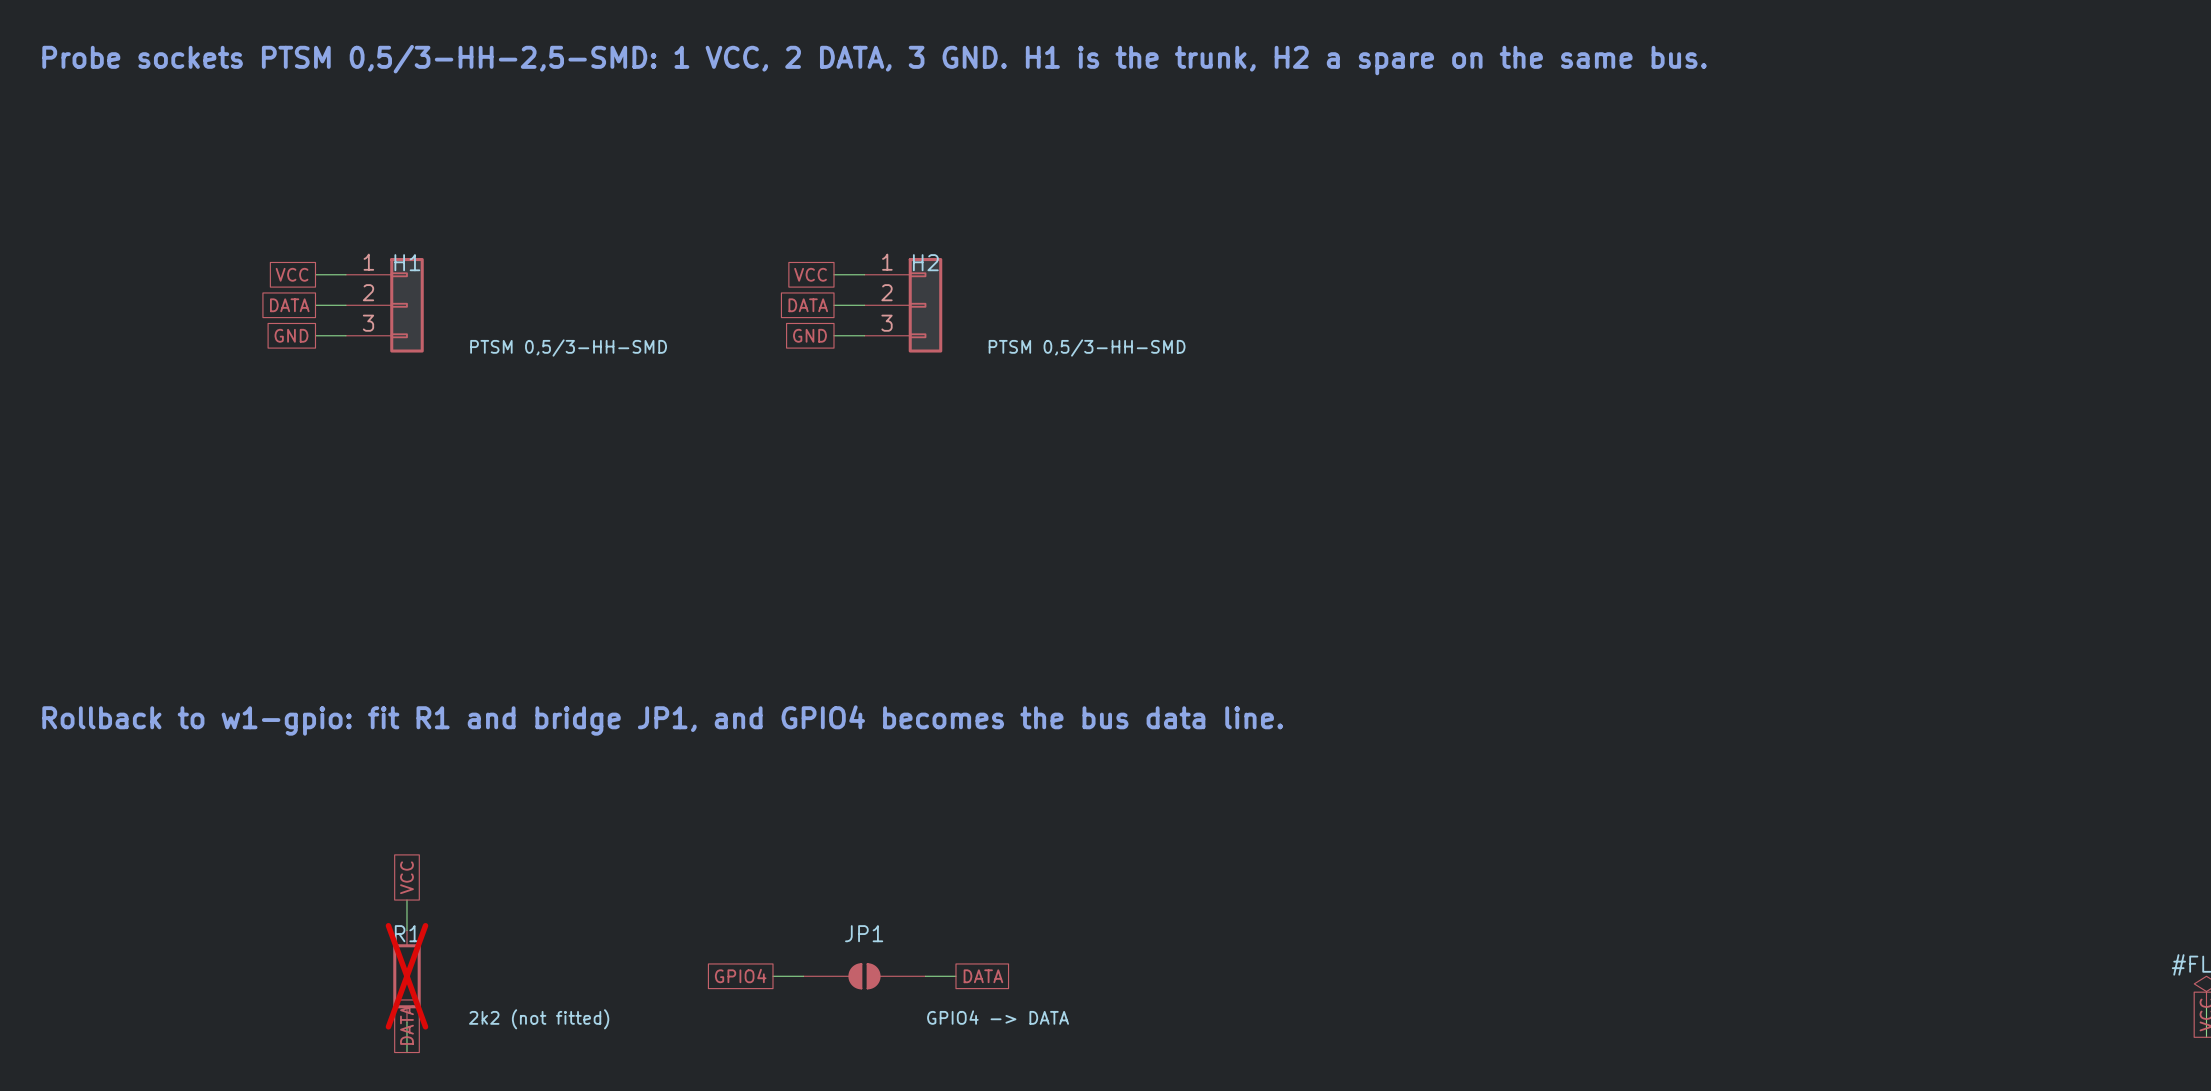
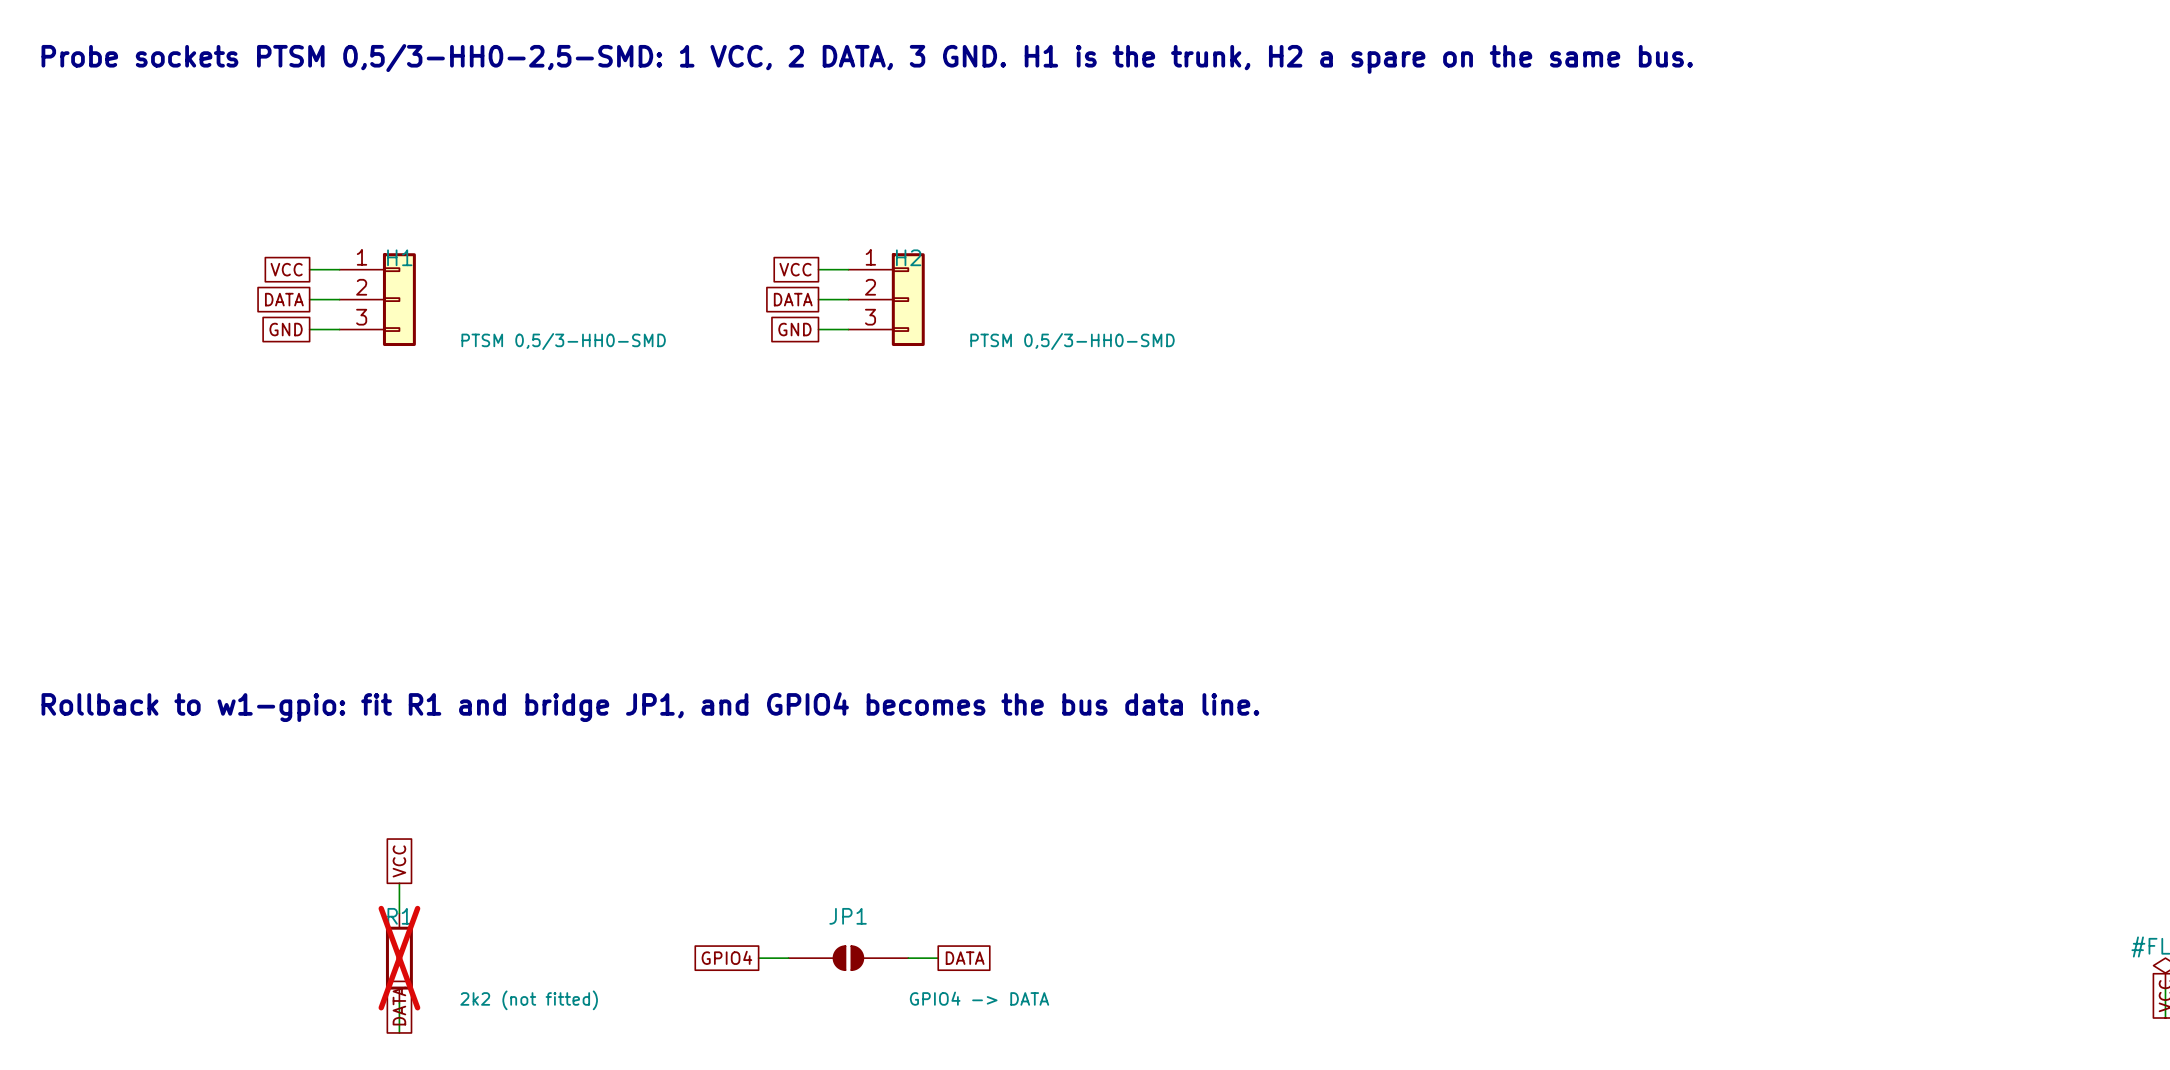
text: Probe sockets PTSM 0,5/3-HH-2,5-SMD: 1 VCC, 2 DATA, 3 GND. H1 is the trunk, H2 a spare on the same bus. (874, 60) -> Probe sockets PTSM 0,5/3-HH0-2,5-SMD: 1 VCC, 2 DATA, 3 GND. H1 is the trunk, H2 a spare on the same bus. (867, 58)
H1 value: PTSM 0,5/3-HH-SMD (568, 348) -> PTSM 0,5/3-HH0-SMD (563, 341)
H2 value: PTSM 0,5/3-HH-SMD (1087, 348) -> PTSM 0,5/3-HH0-SMD (1072, 341)

